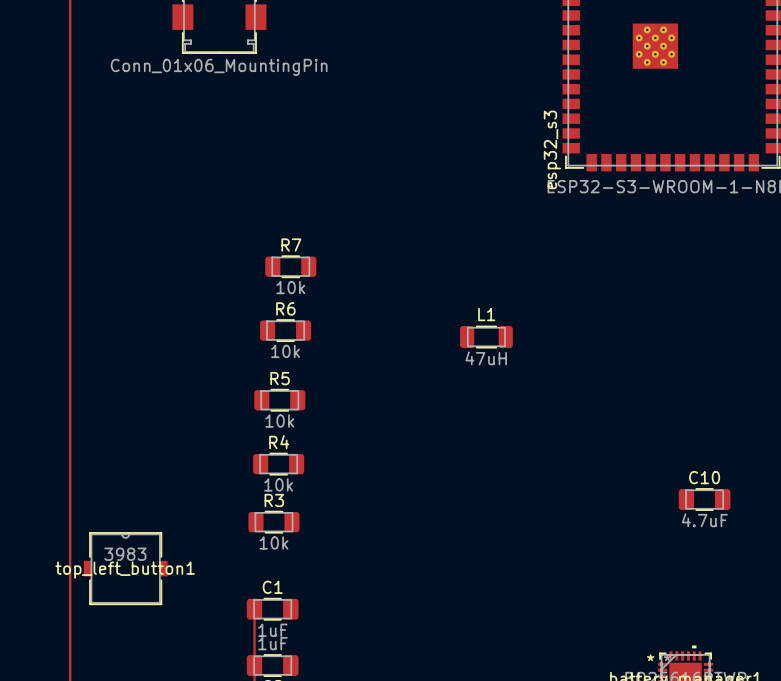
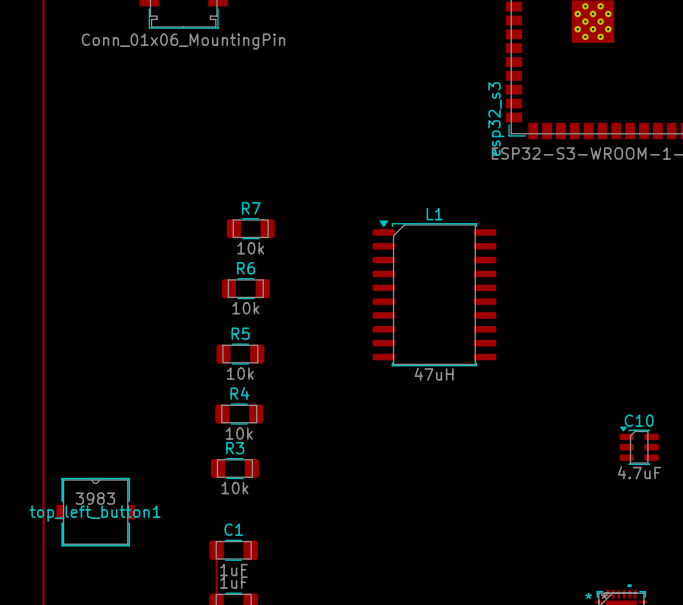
L1 name position: L1 (486, 314) -> L1 (434, 214)
L1 footprint: [460, 325, 513, 349] -> [372, 220, 497, 367]
L1 value position: 47uH (486, 358) -> 47uH (434, 374)
C10 footprint: [678, 488, 731, 511] -> [619, 426, 659, 465]

